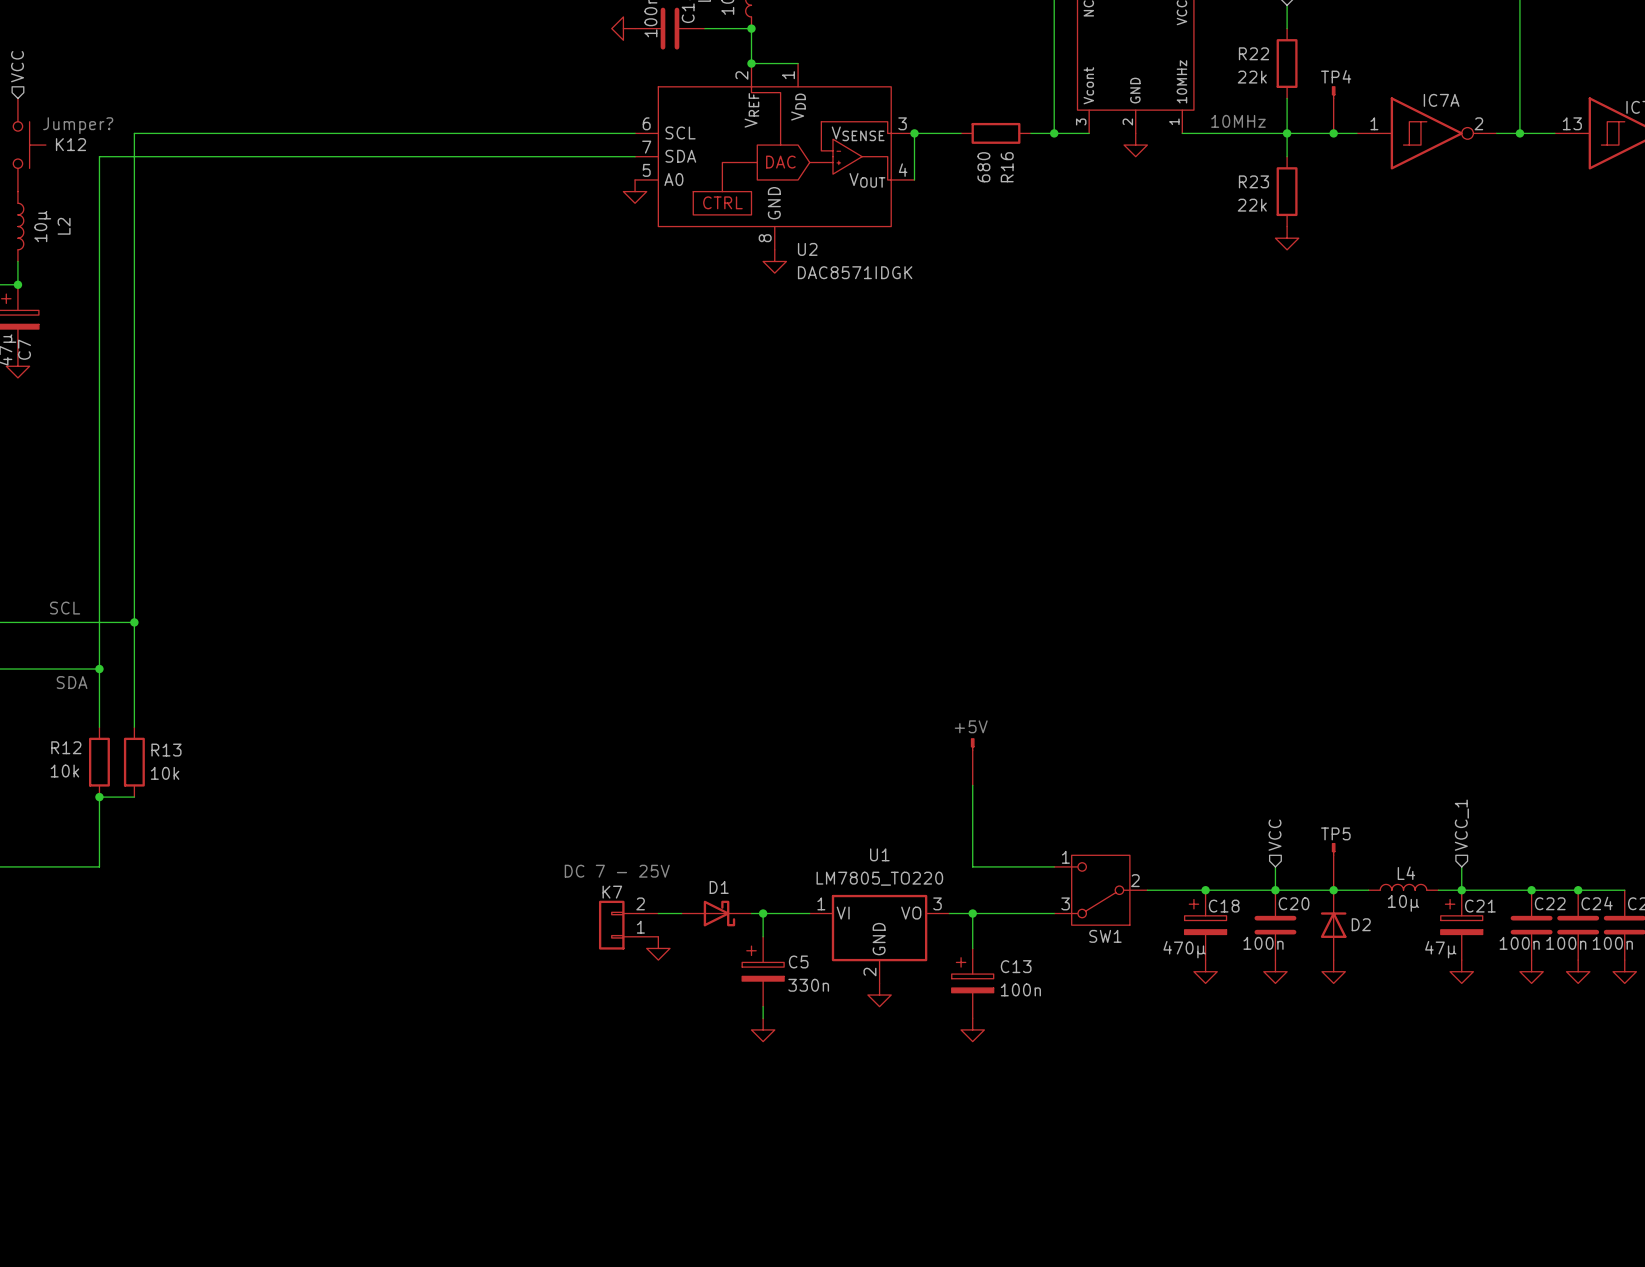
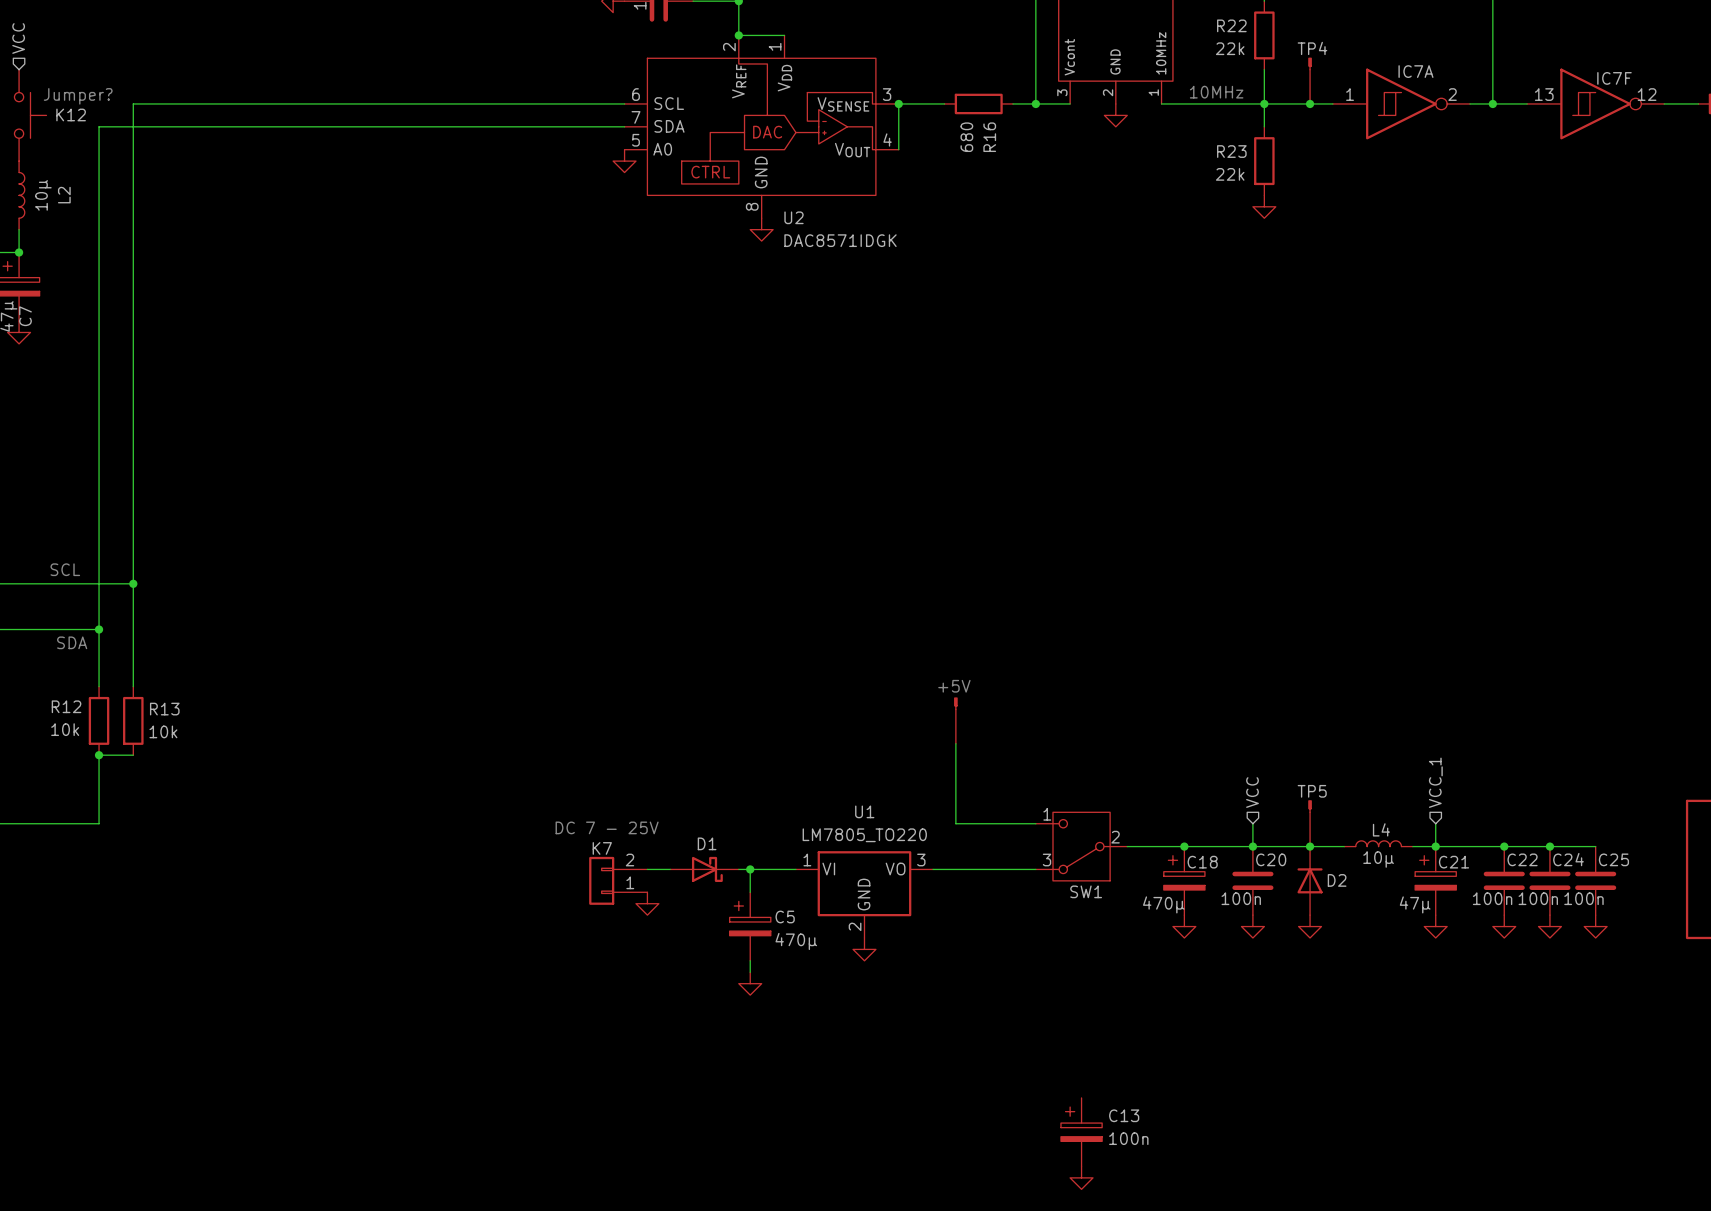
wire: (972, 913) (972, 948) -> none
junction: (972, 913) -> none
C13 position: (972, 983) -> (1081, 1132)
C5 value: 330n (808, 985) -> 470µ (796, 941)
power symbol: (972, 1029) -> none
power symbol: none -> (1081, 1177)

